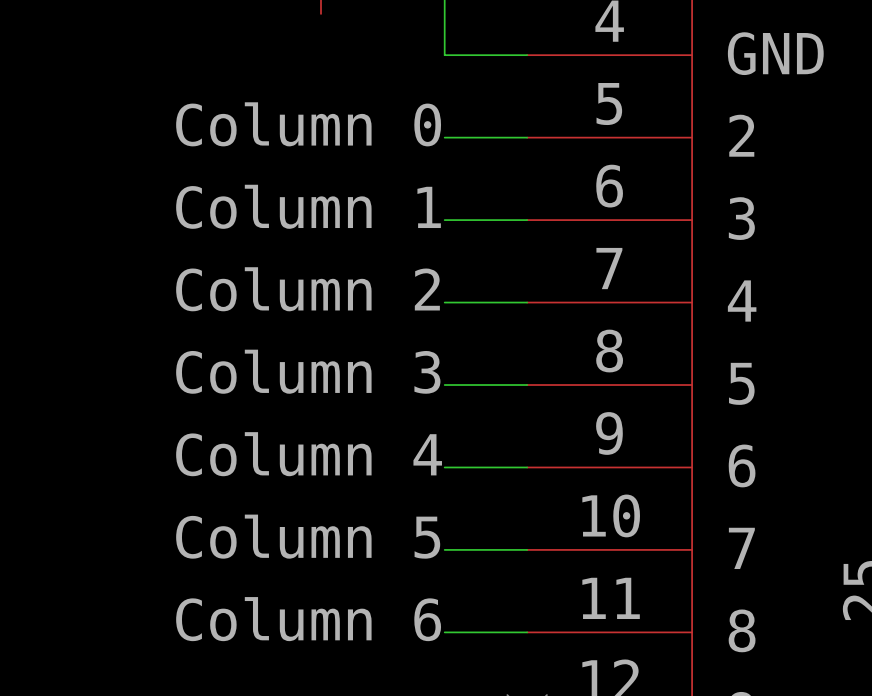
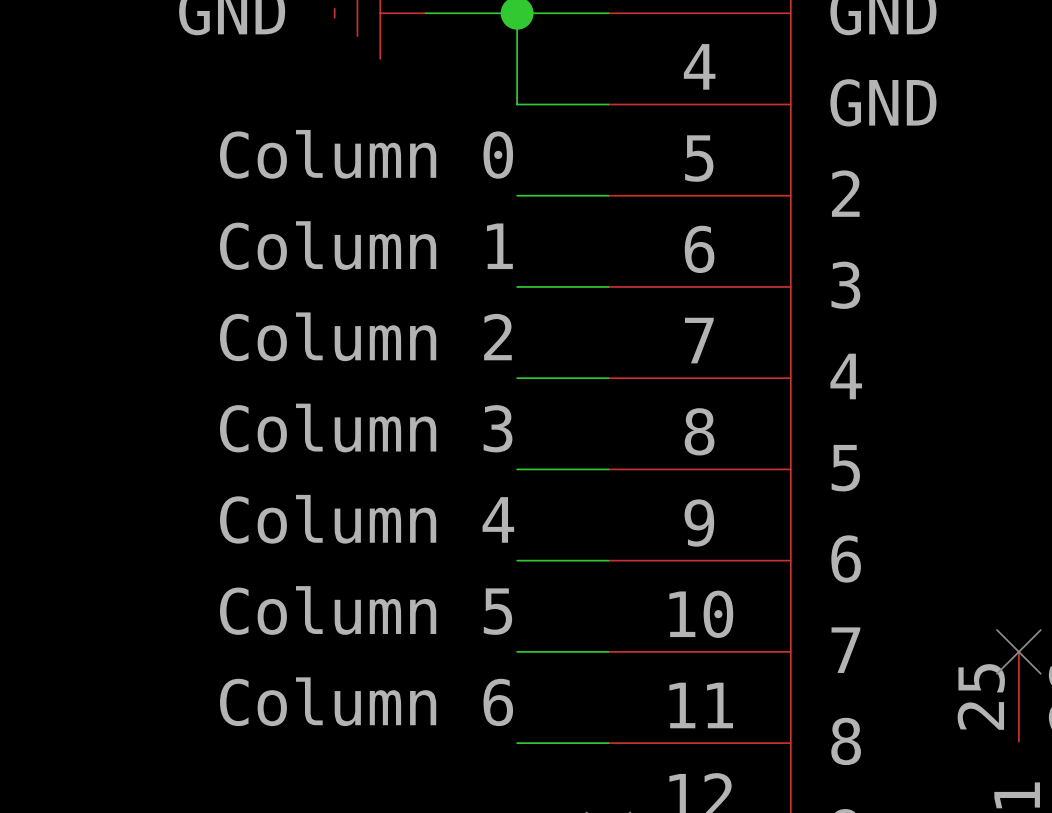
label position: Column 0 (308, 124) -> Column 0 (366, 154)
label position: Column 1 (308, 206) -> Column 1 (366, 245)
label position: Column 2 (308, 289) -> Column 2 (365, 336)
label position: Column 3 (308, 371) -> Column 3 (366, 428)
label position: Column 4 (309, 454) -> Column 4 (367, 519)
label position: Column 5 (308, 536) -> Column 5 (366, 610)
label position: Column 6 (308, 619) -> Column 6 (366, 701)

